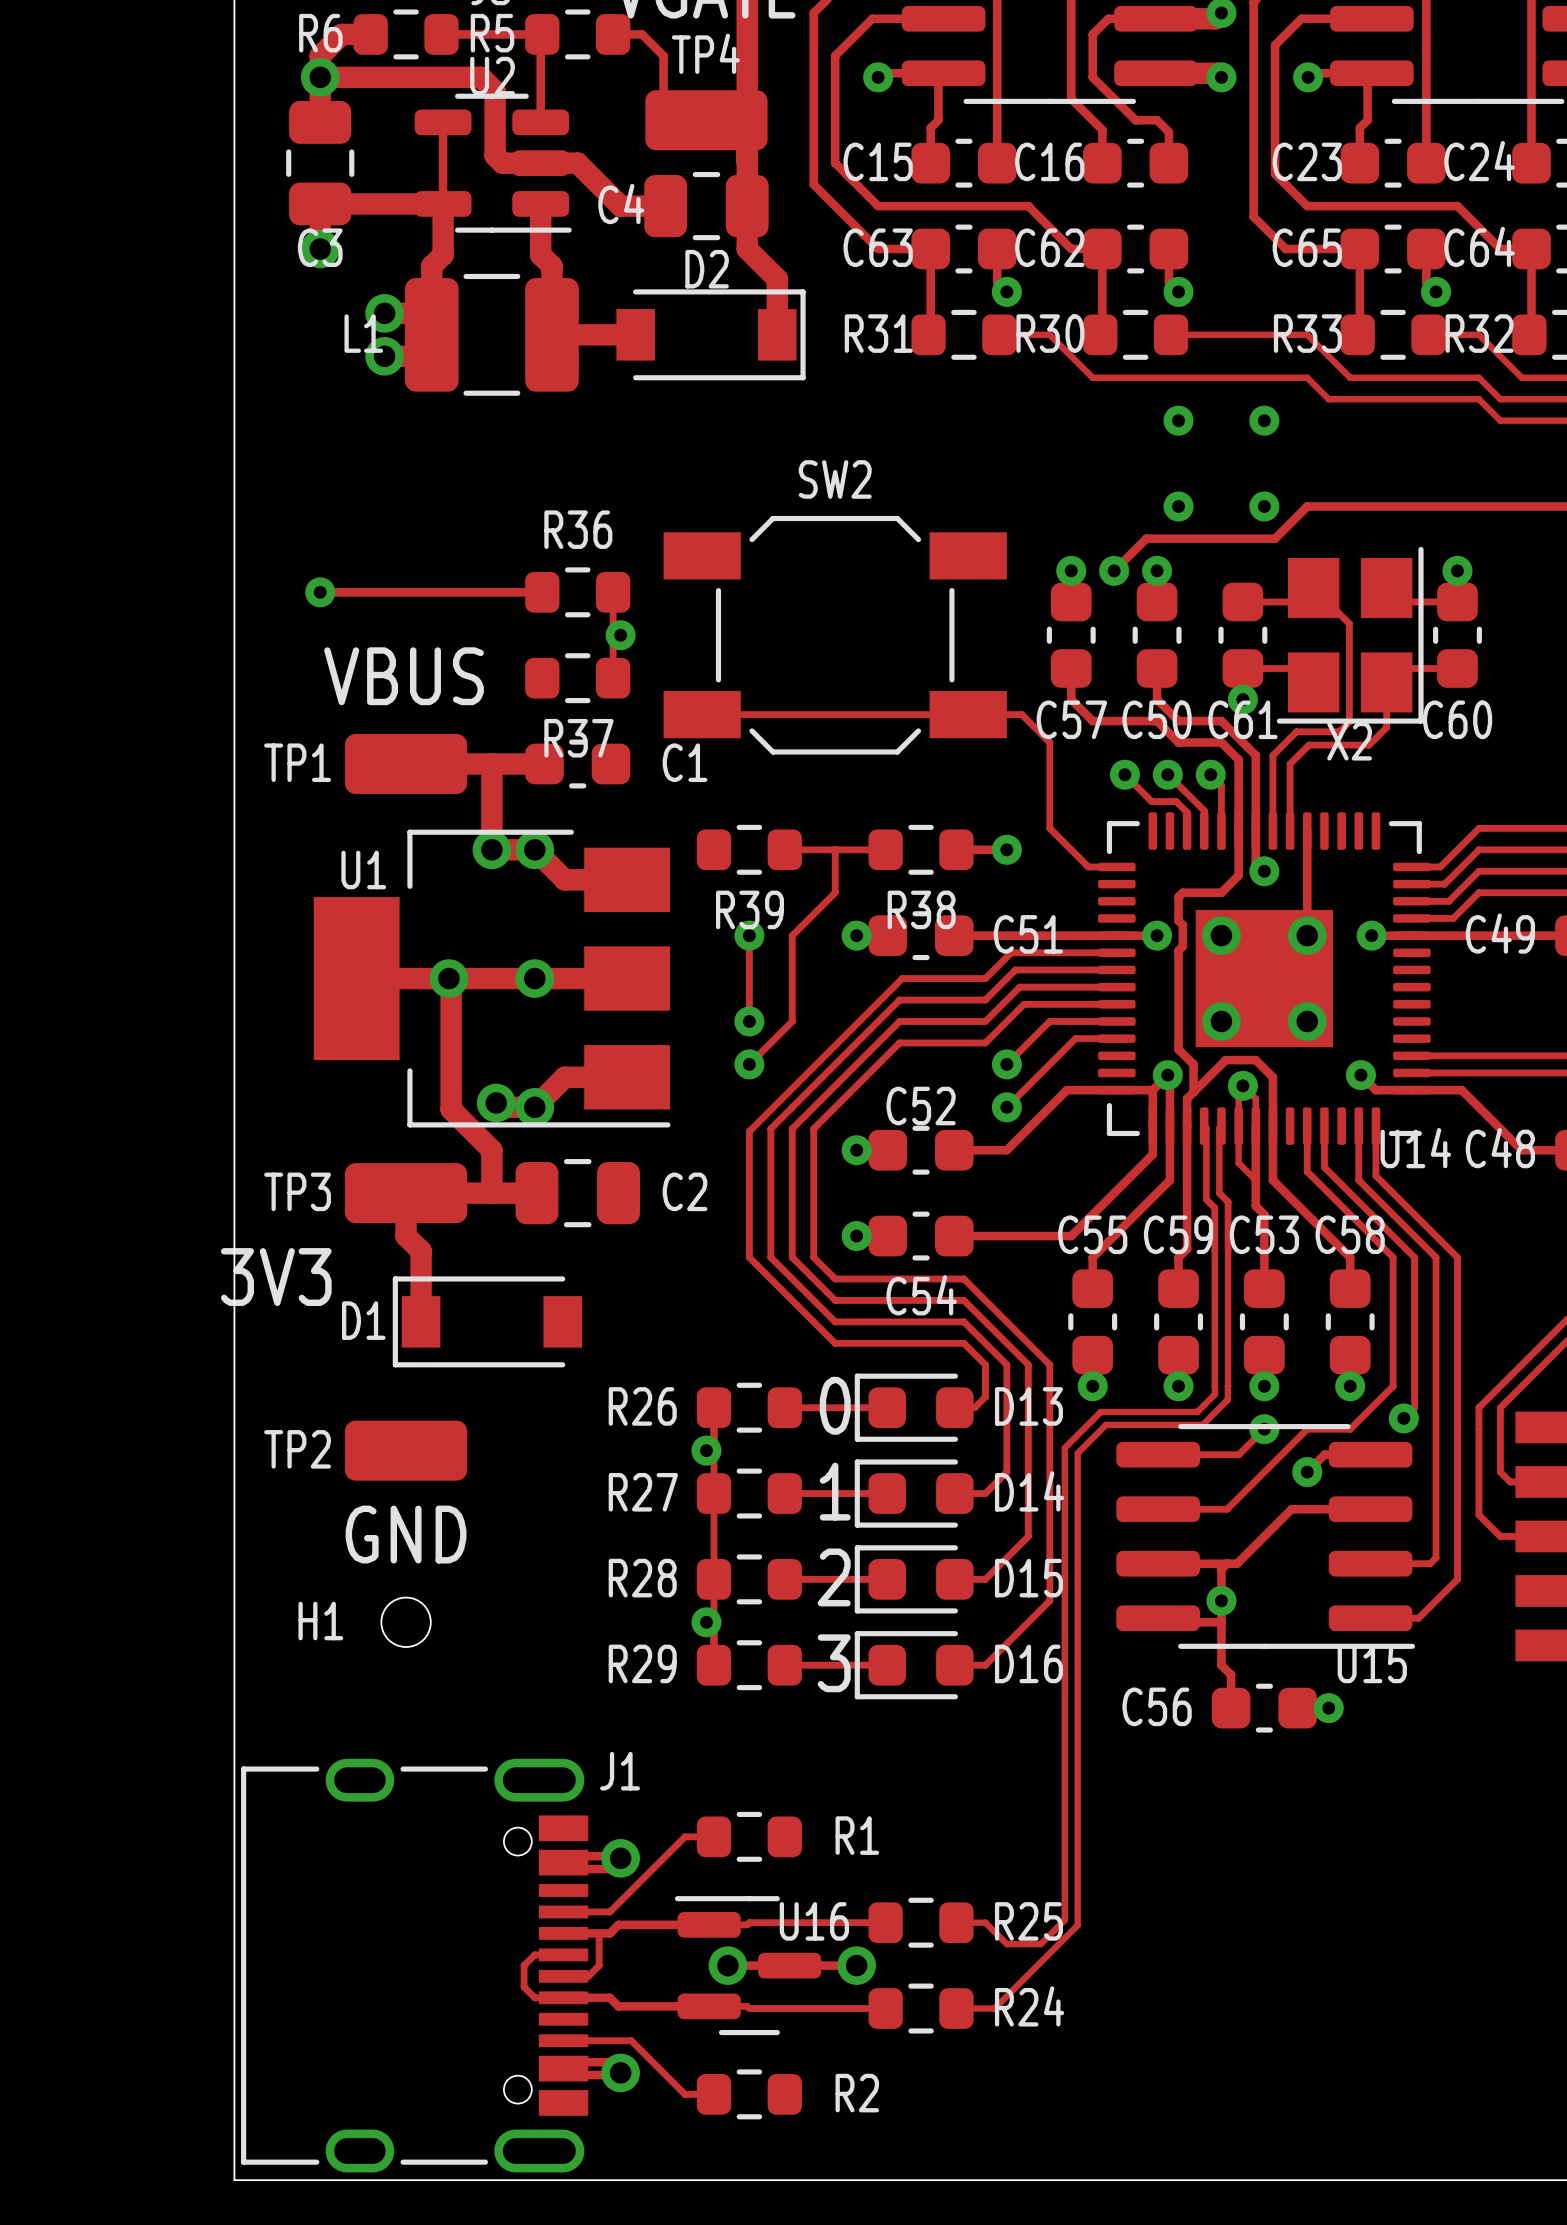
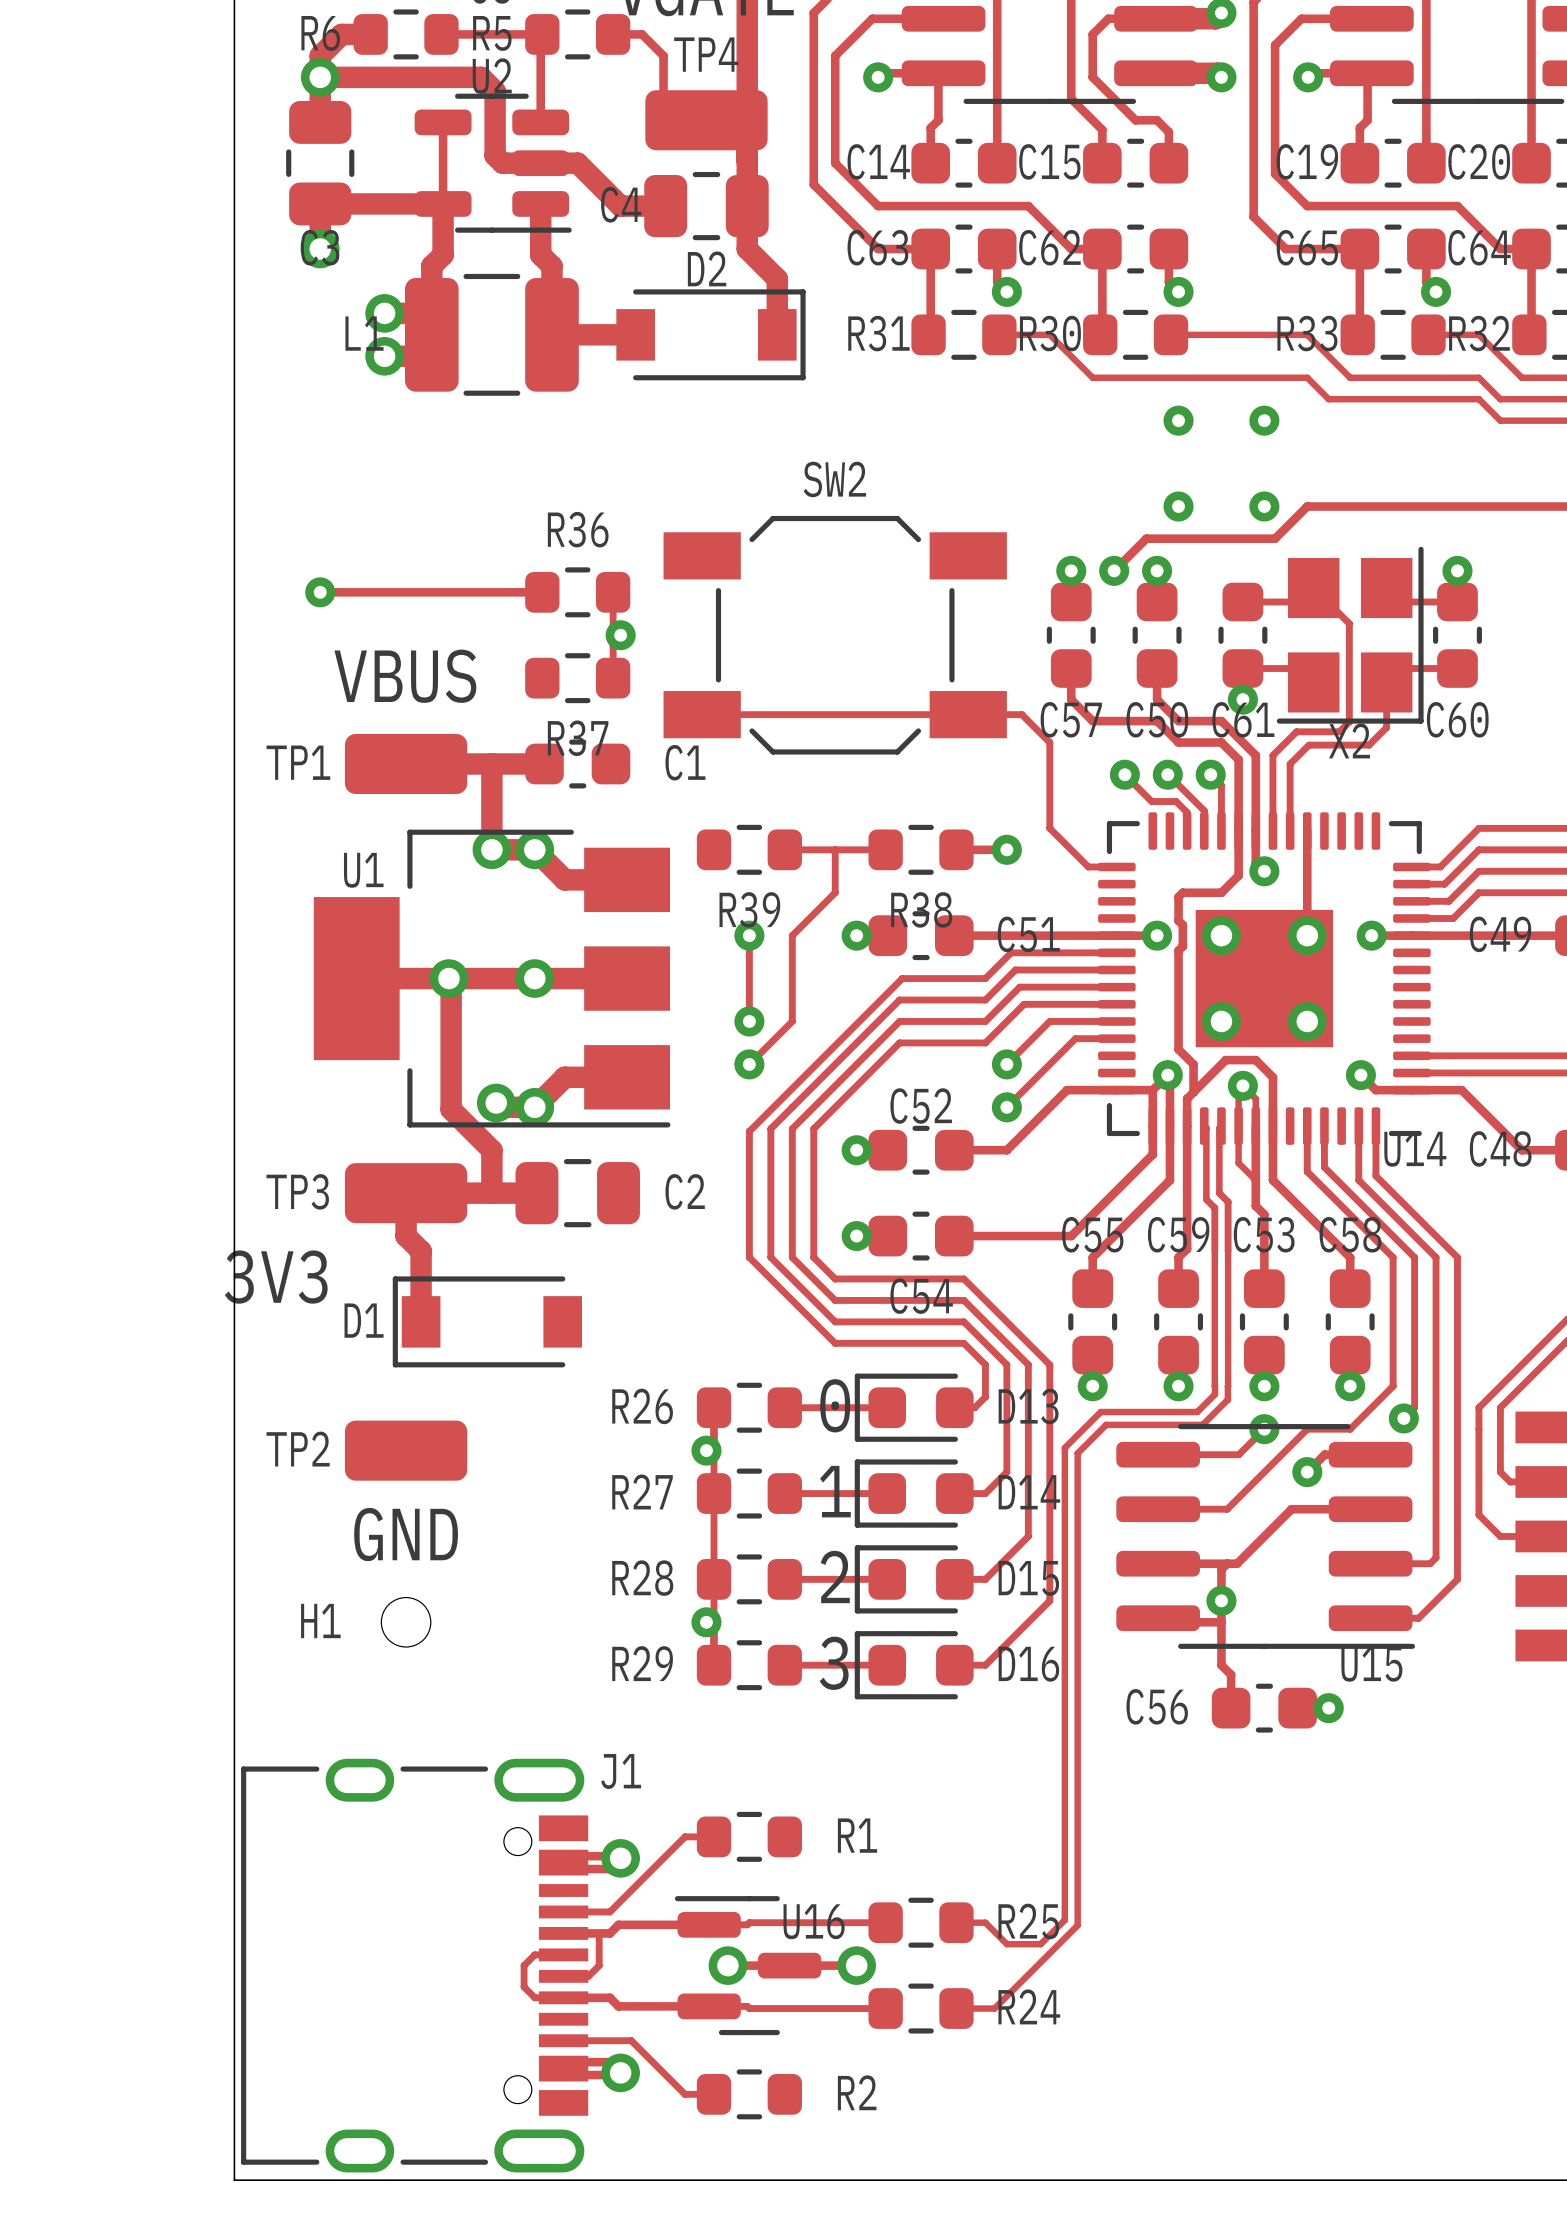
C15 name: C15 (878, 161) -> C14 (878, 161)
C16 name: C16 (1049, 161) -> C15 (1049, 161)
C23 name: C23 (1307, 161) -> C19 (1307, 161)
C24 name: C24 (1479, 161) -> C20 (1479, 161)

